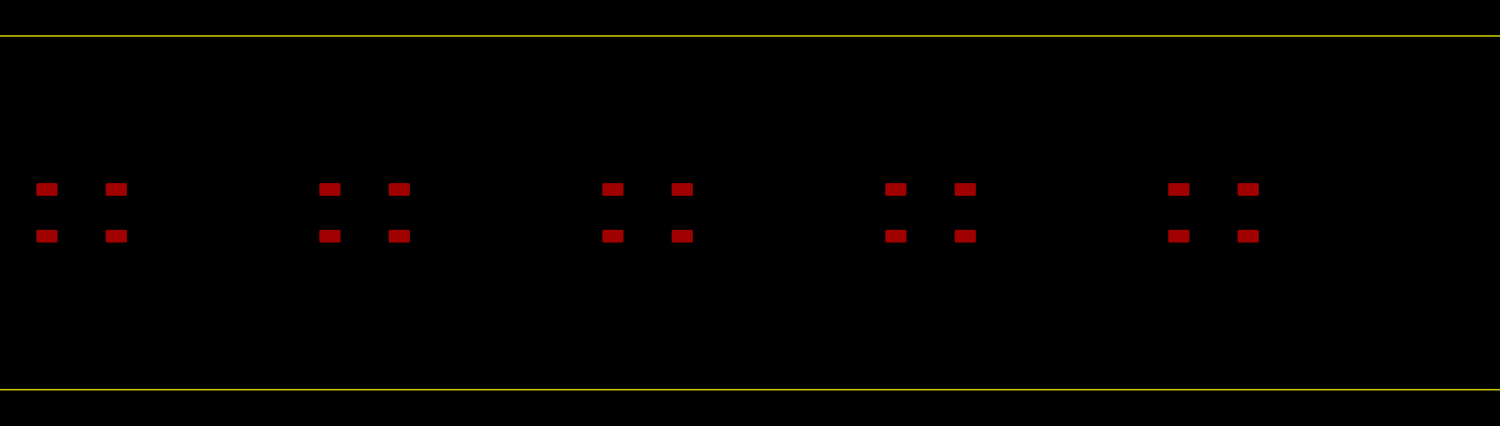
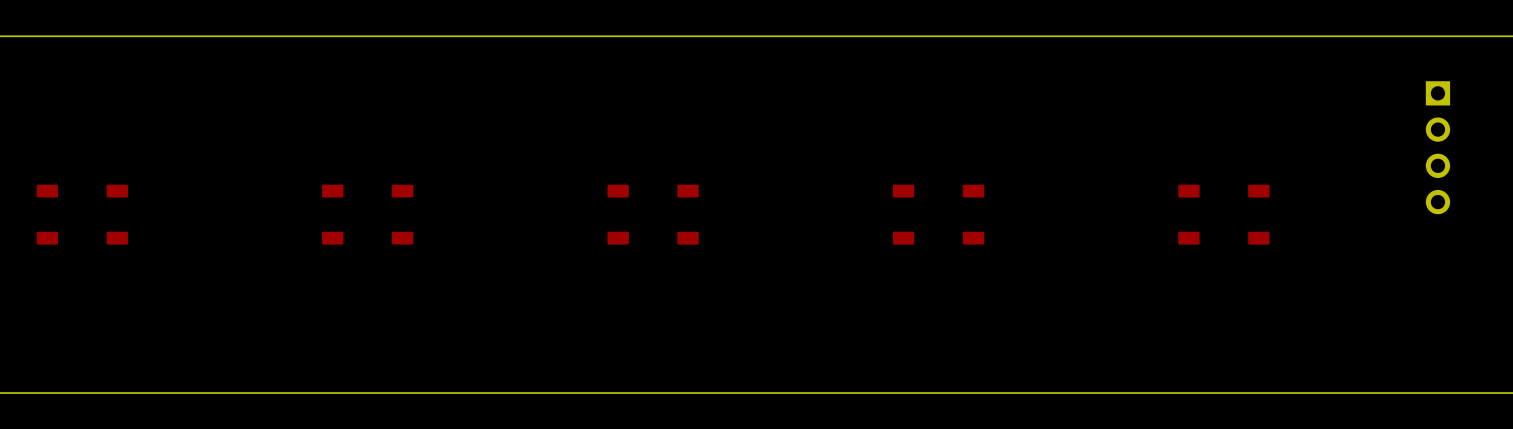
part: none -> (1437, 147)

